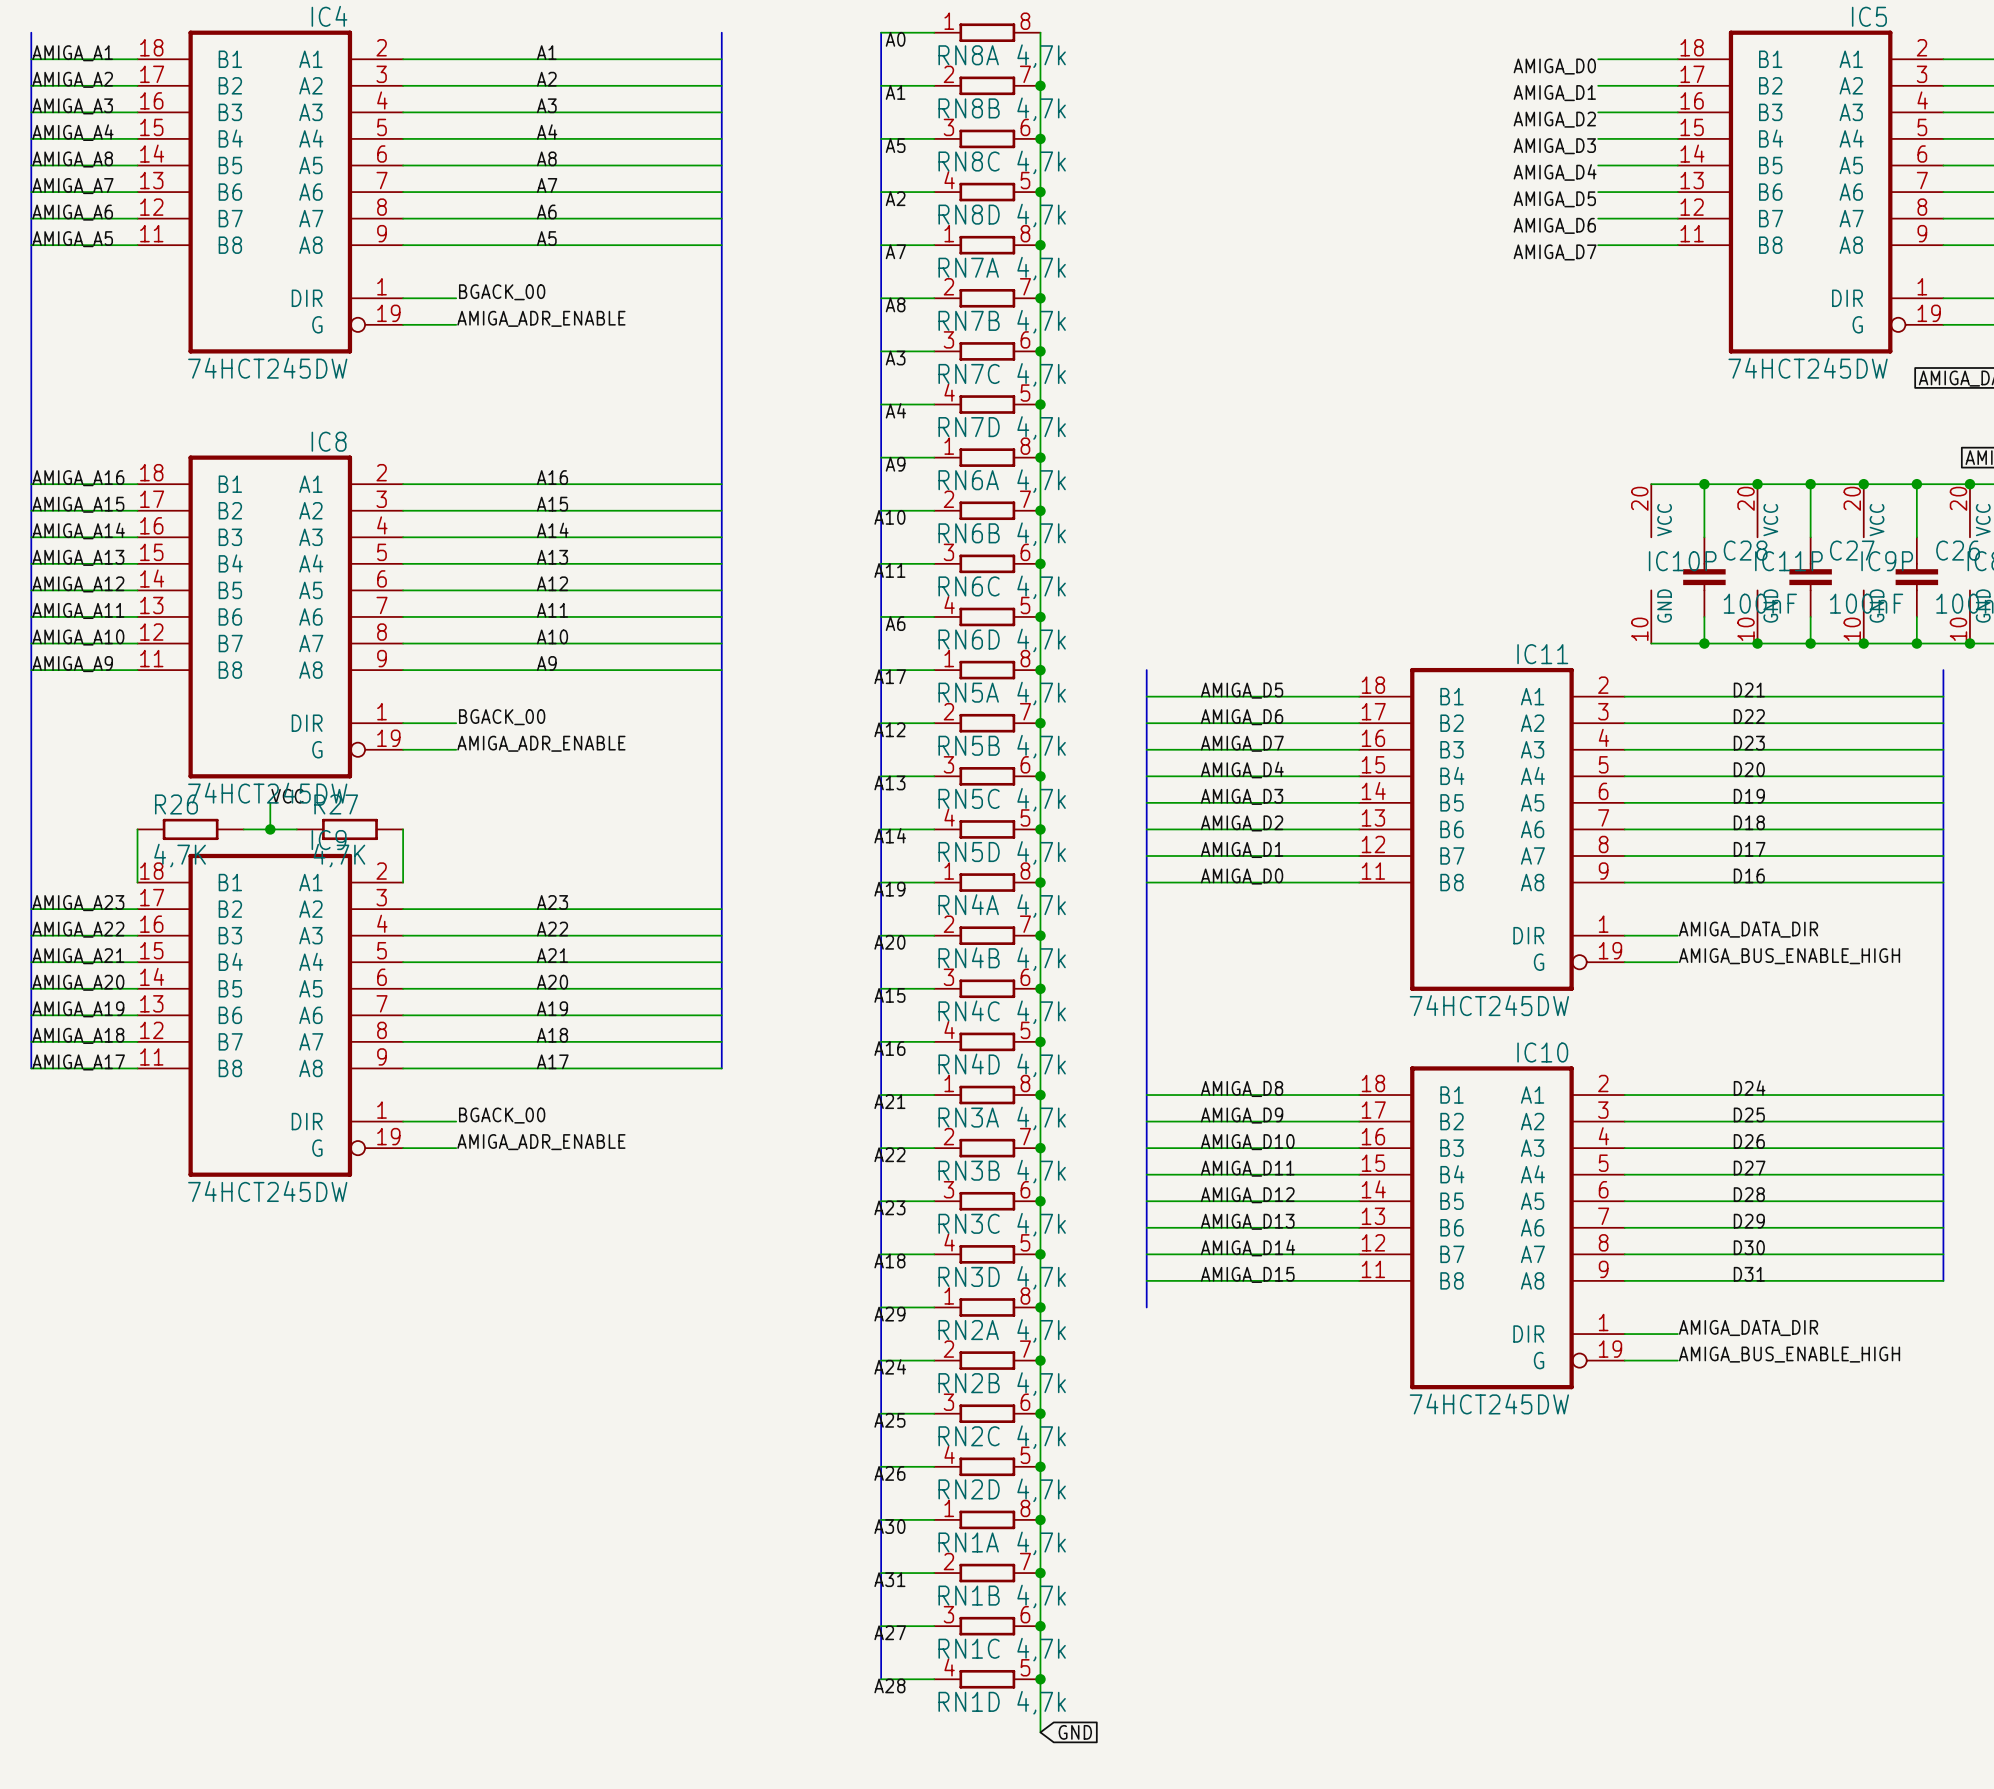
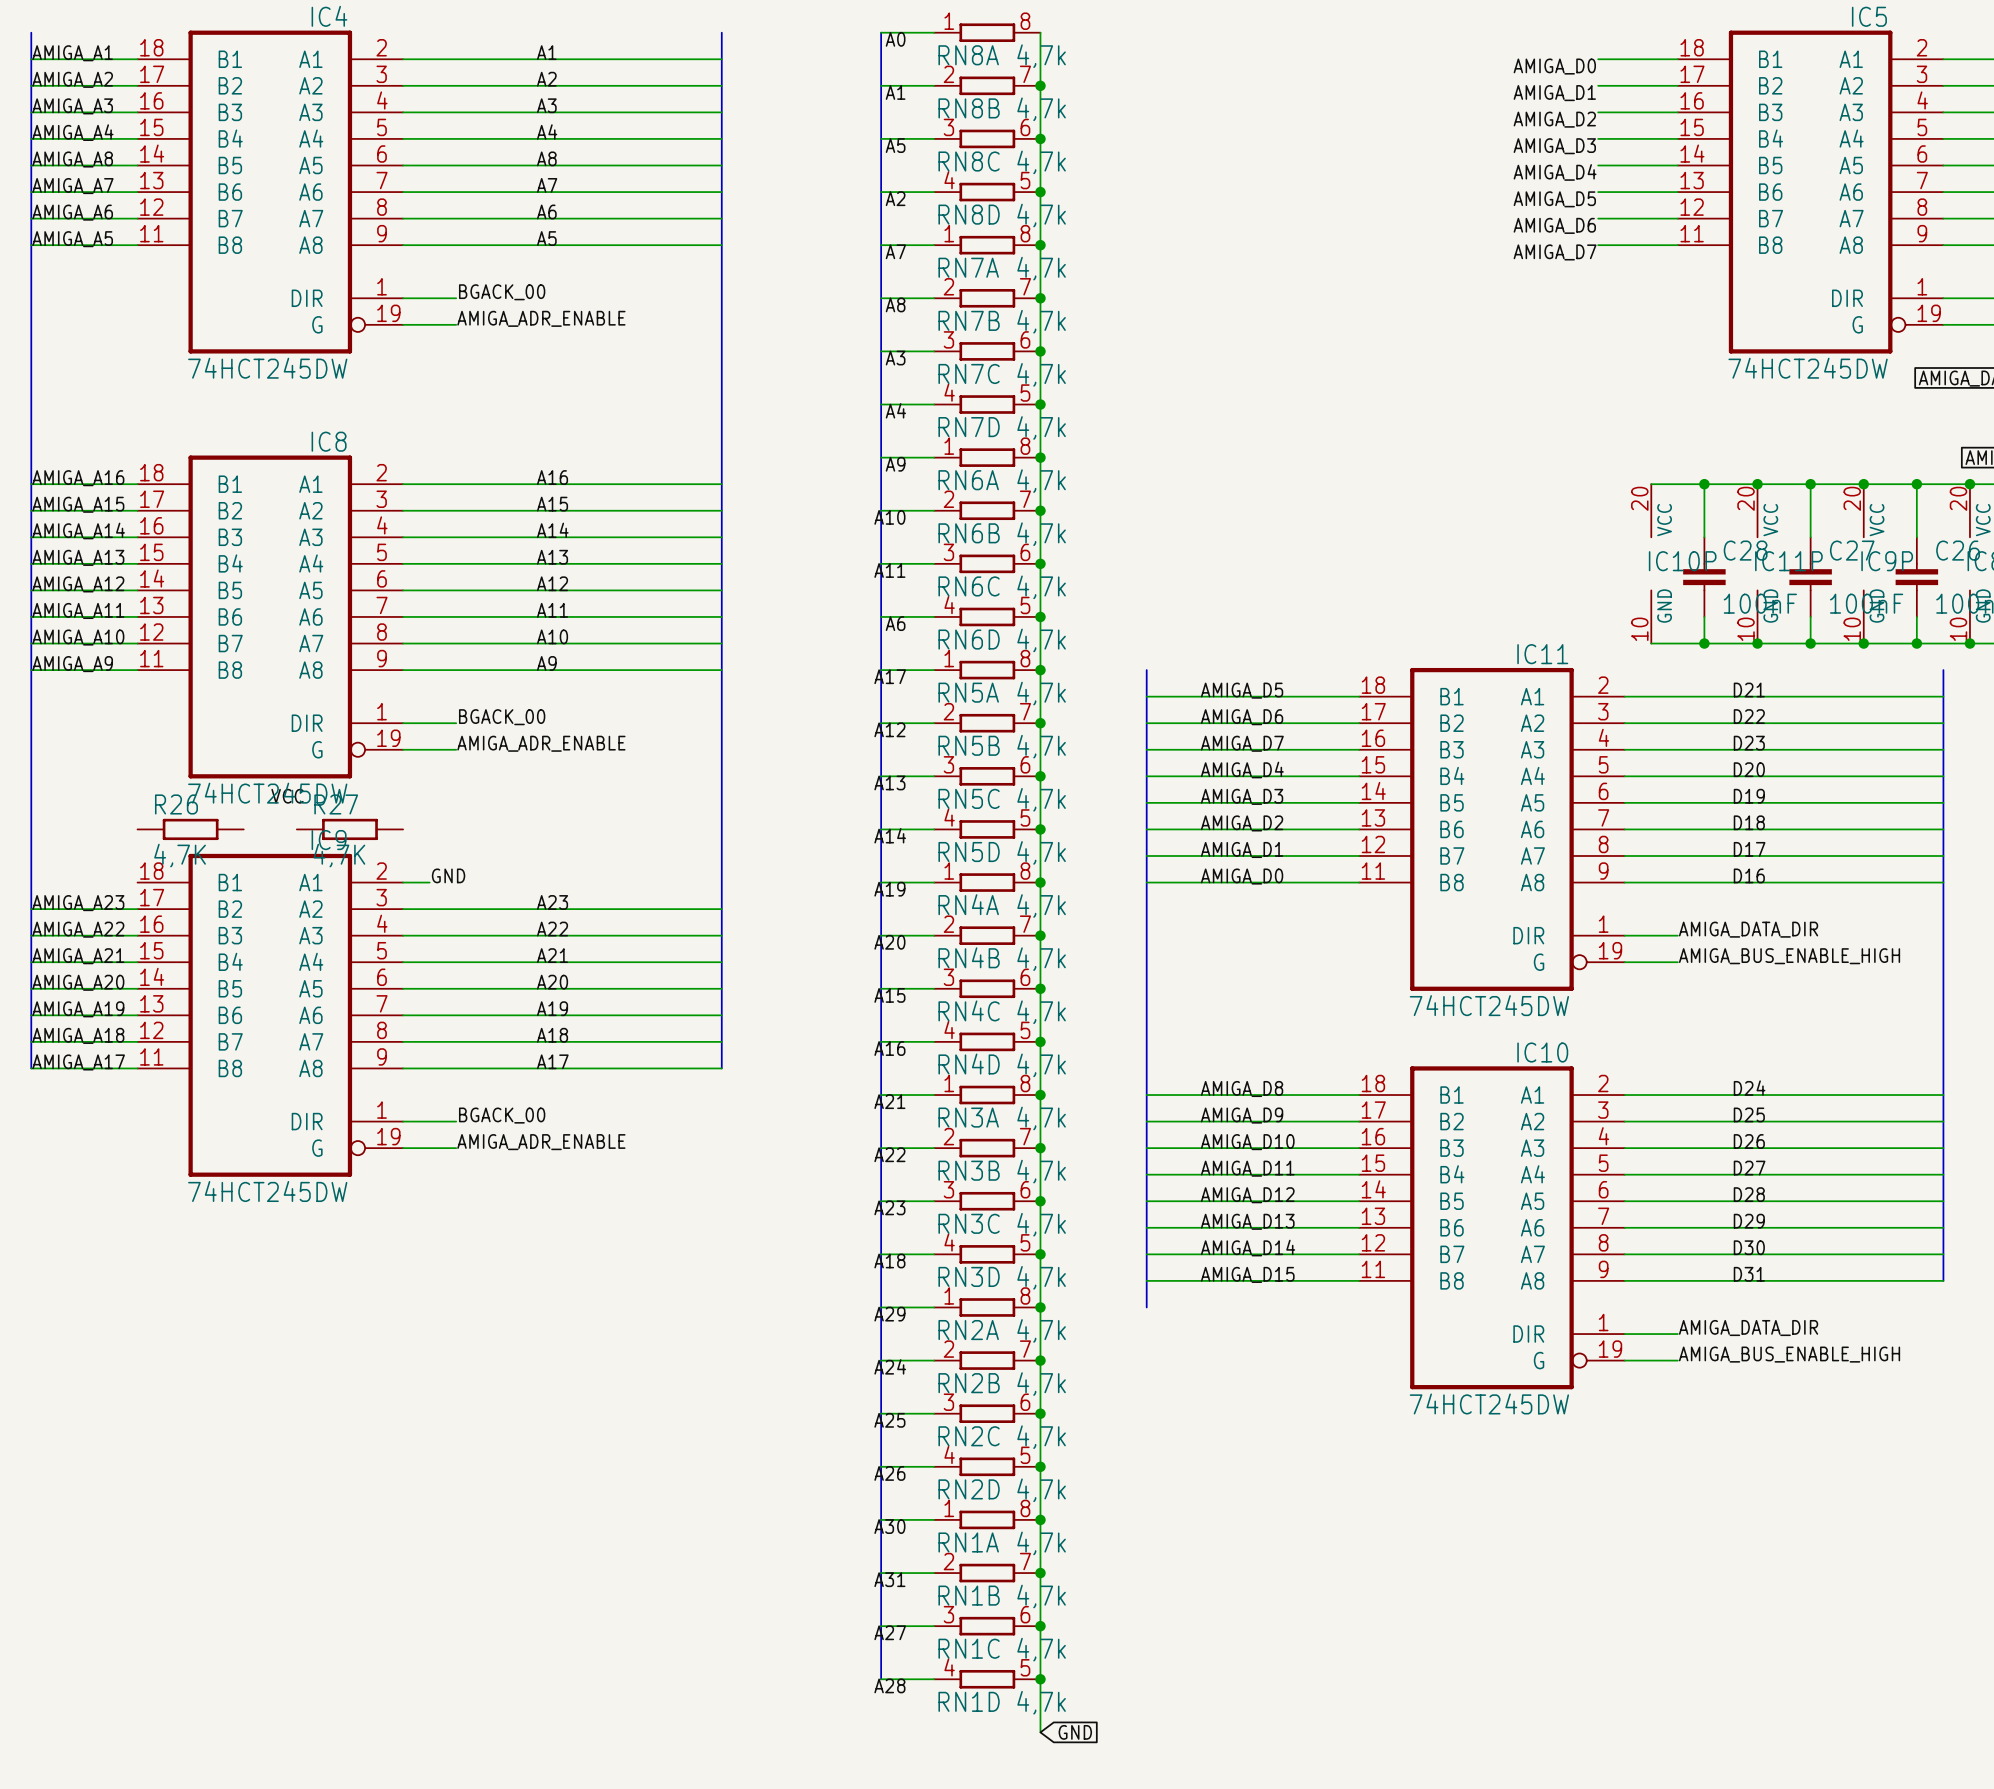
wire: (270, 802) (270, 829) -> none
wire: (137, 829) (137, 882) -> none
wire: (243, 829) (296, 829) -> none
junction: (270, 829) -> none
wire: (403, 829) (403, 882) -> (429, 882) (403, 882)
label: none -> GND (448, 875)

